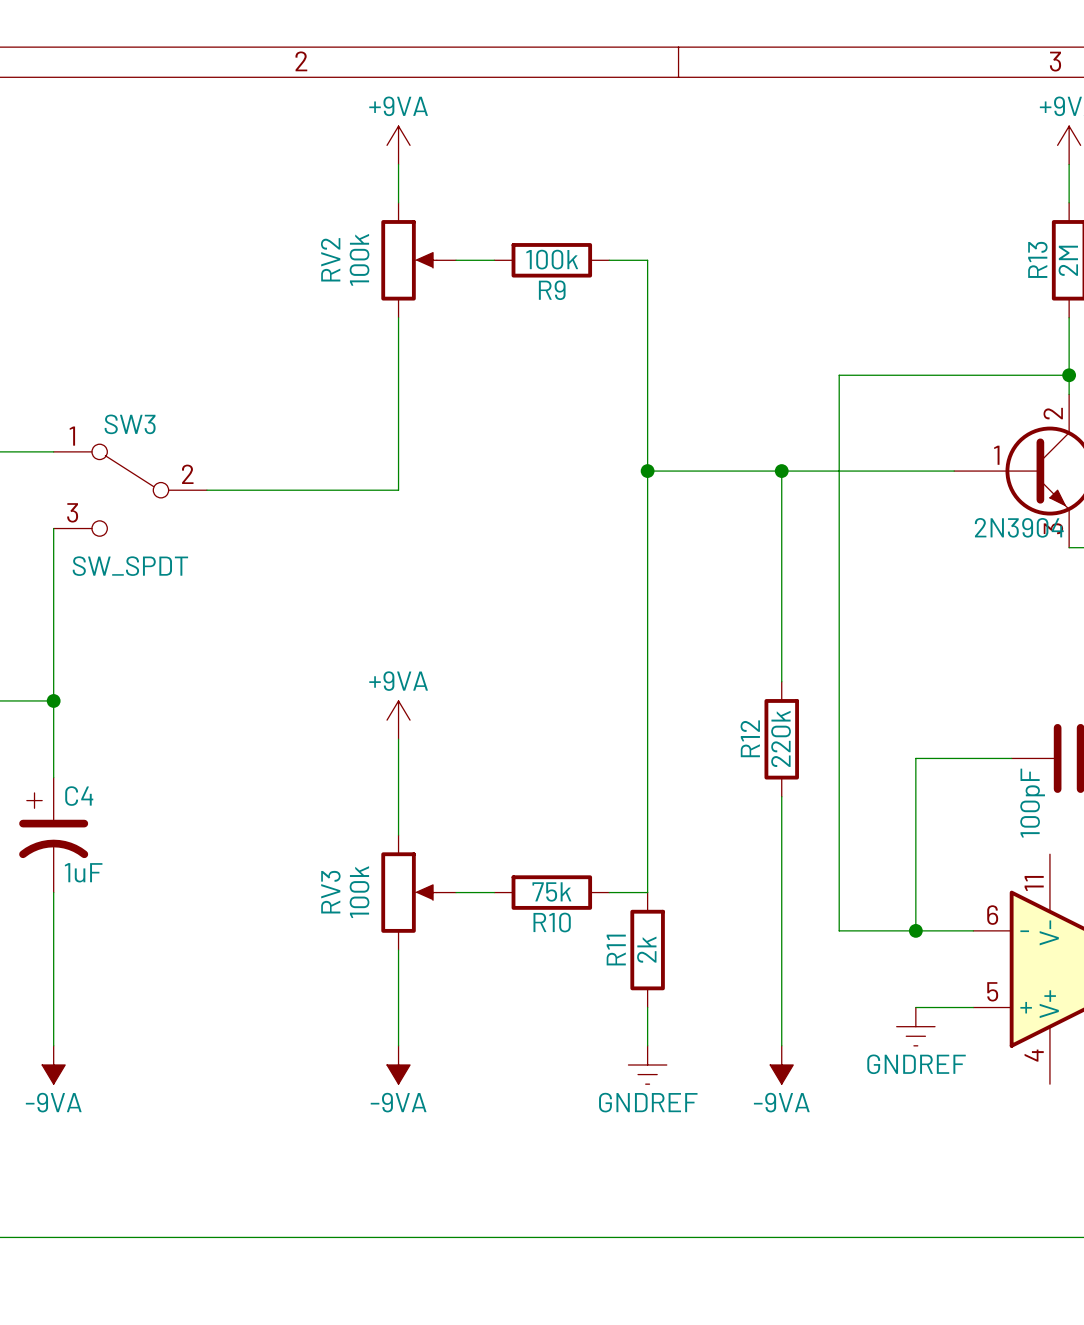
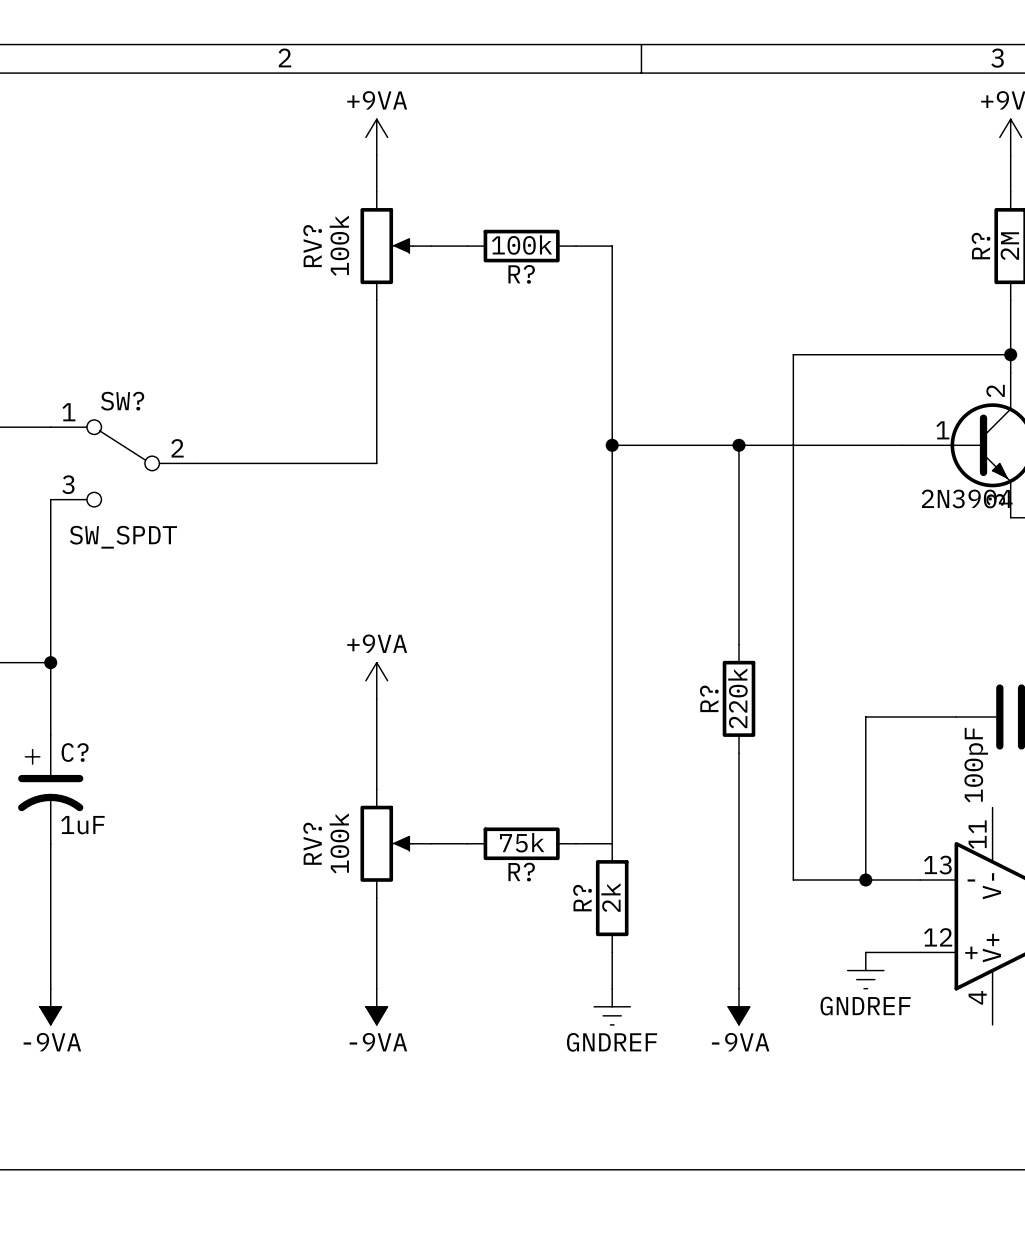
RV2 name: RV2 (330, 259) -> RV? (312, 246)
R13 name: R13 (1037, 259) -> R? (980, 246)
R9 name: R9 (552, 290) -> R? (521, 274)
SW3 name: SW3 (130, 424) -> SW? (122, 401)
R12 name: R12 (750, 738) -> R? (709, 698)
C4 name: C4 (79, 796) -> C? (75, 752)
RV3 name: RV3 (330, 892) -> RV? (312, 843)
part pin number: 6 (992, 915) -> 13 (937, 865)
R10 name: R10 (552, 922) -> R? (521, 872)
R11 name: R11 (616, 950) -> R? (582, 898)
part pin number: 5 (992, 991) -> 12 (938, 937)

